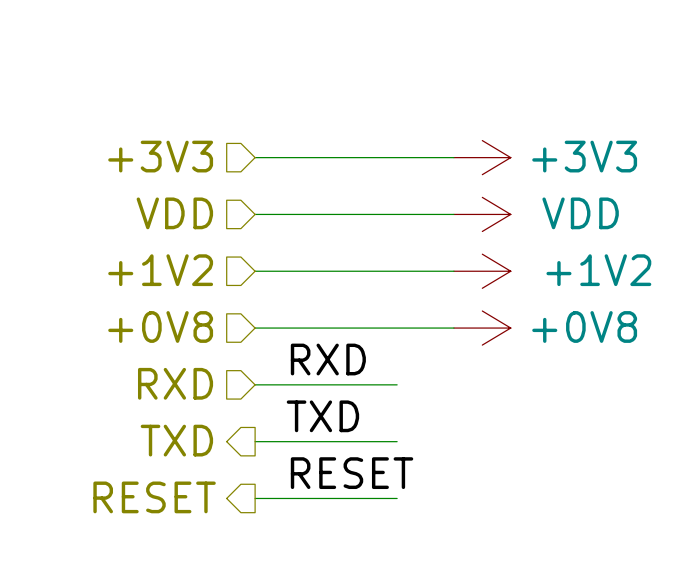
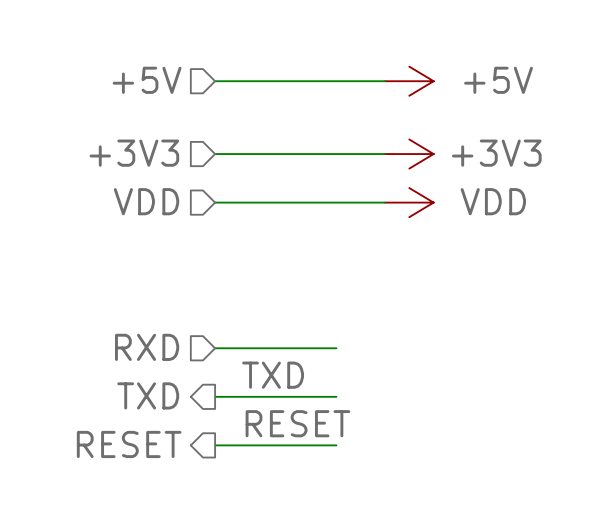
hierarchical label: none -> +5V (147, 80)
power symbol: none -> +5V (409, 81)
hierarchical label: +1V2 (160, 270) -> none
wire: (255, 271) (453, 271) -> (215, 81) (385, 81)
power symbol: +1V2 (482, 271) -> none
hierarchical label: +0V8 (160, 326) -> none
wire: (255, 328) (453, 328) -> none
power symbol: +0V8 (482, 328) -> none
label: RXD (328, 359) -> none

